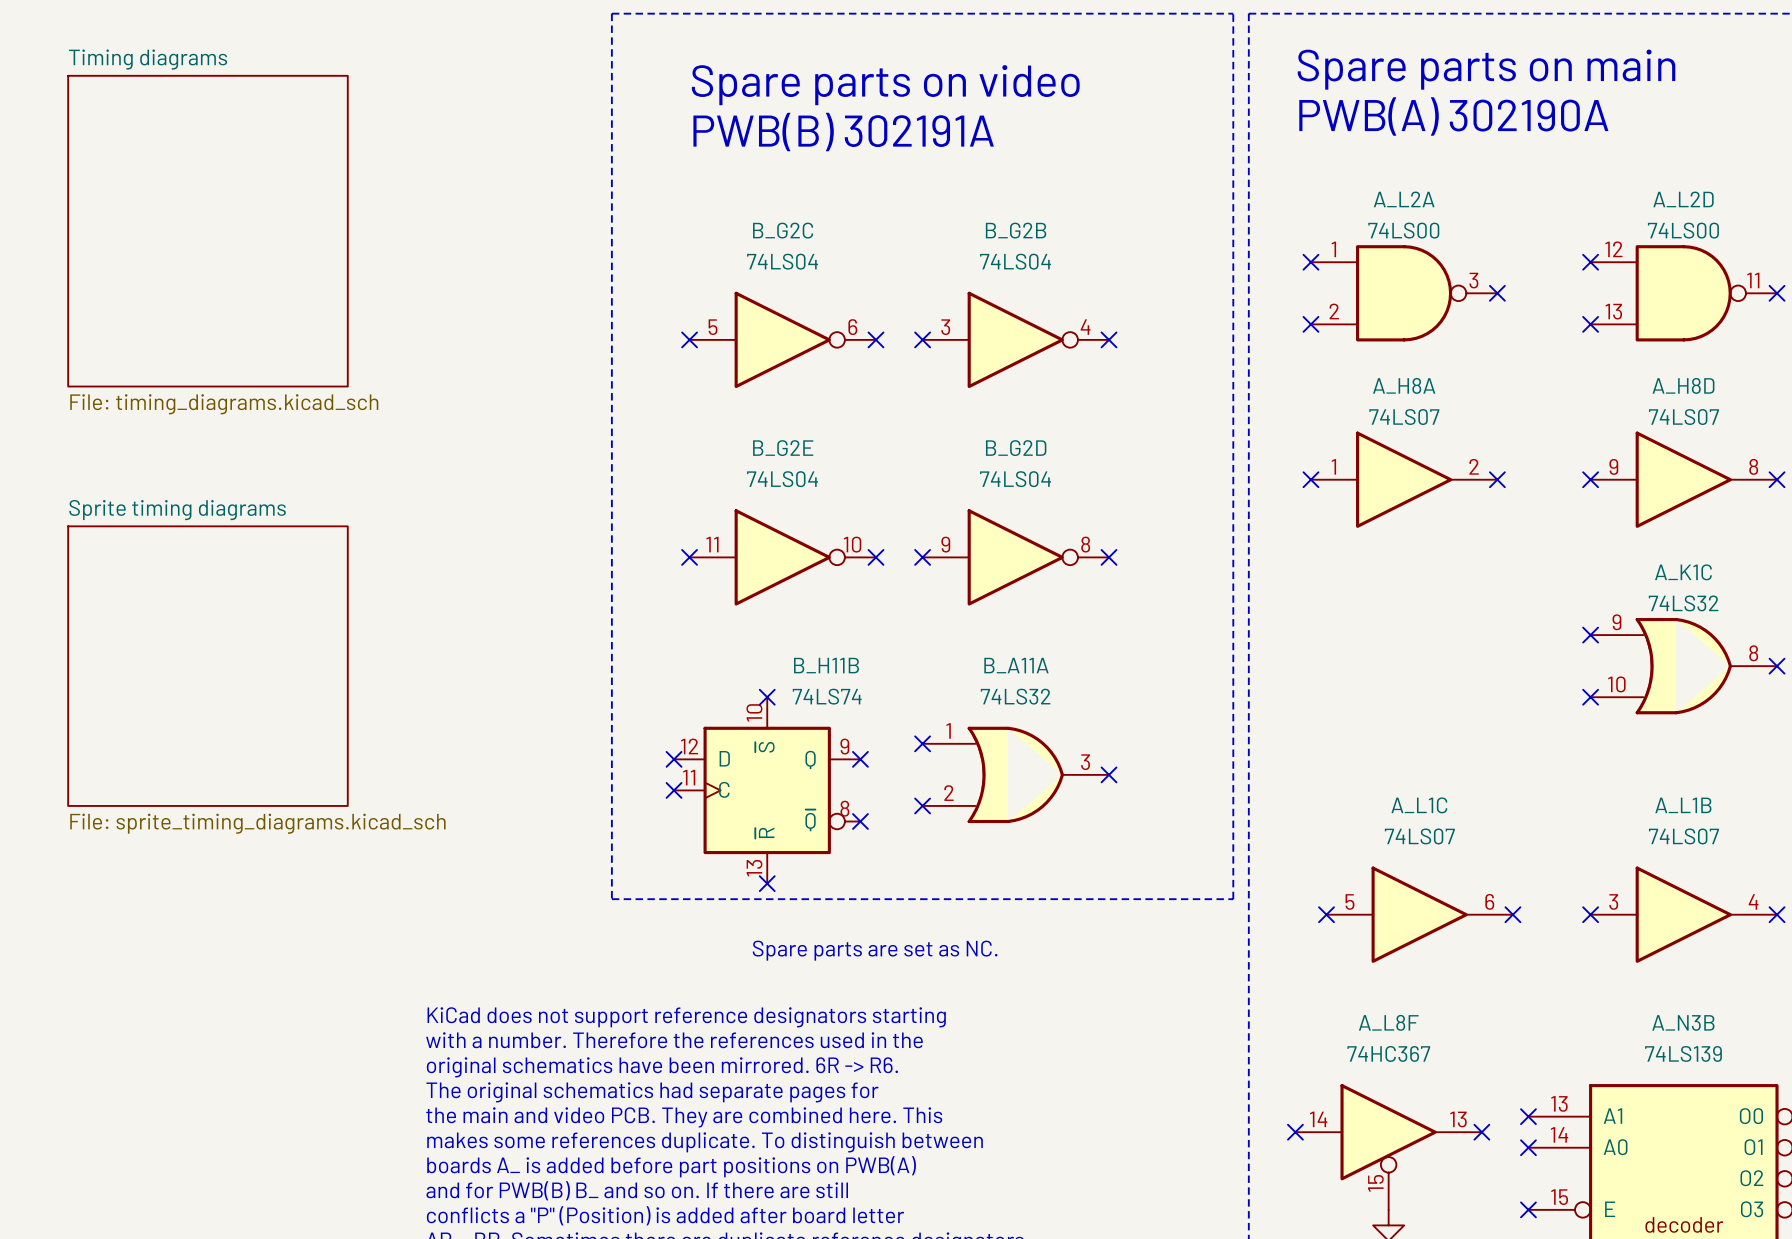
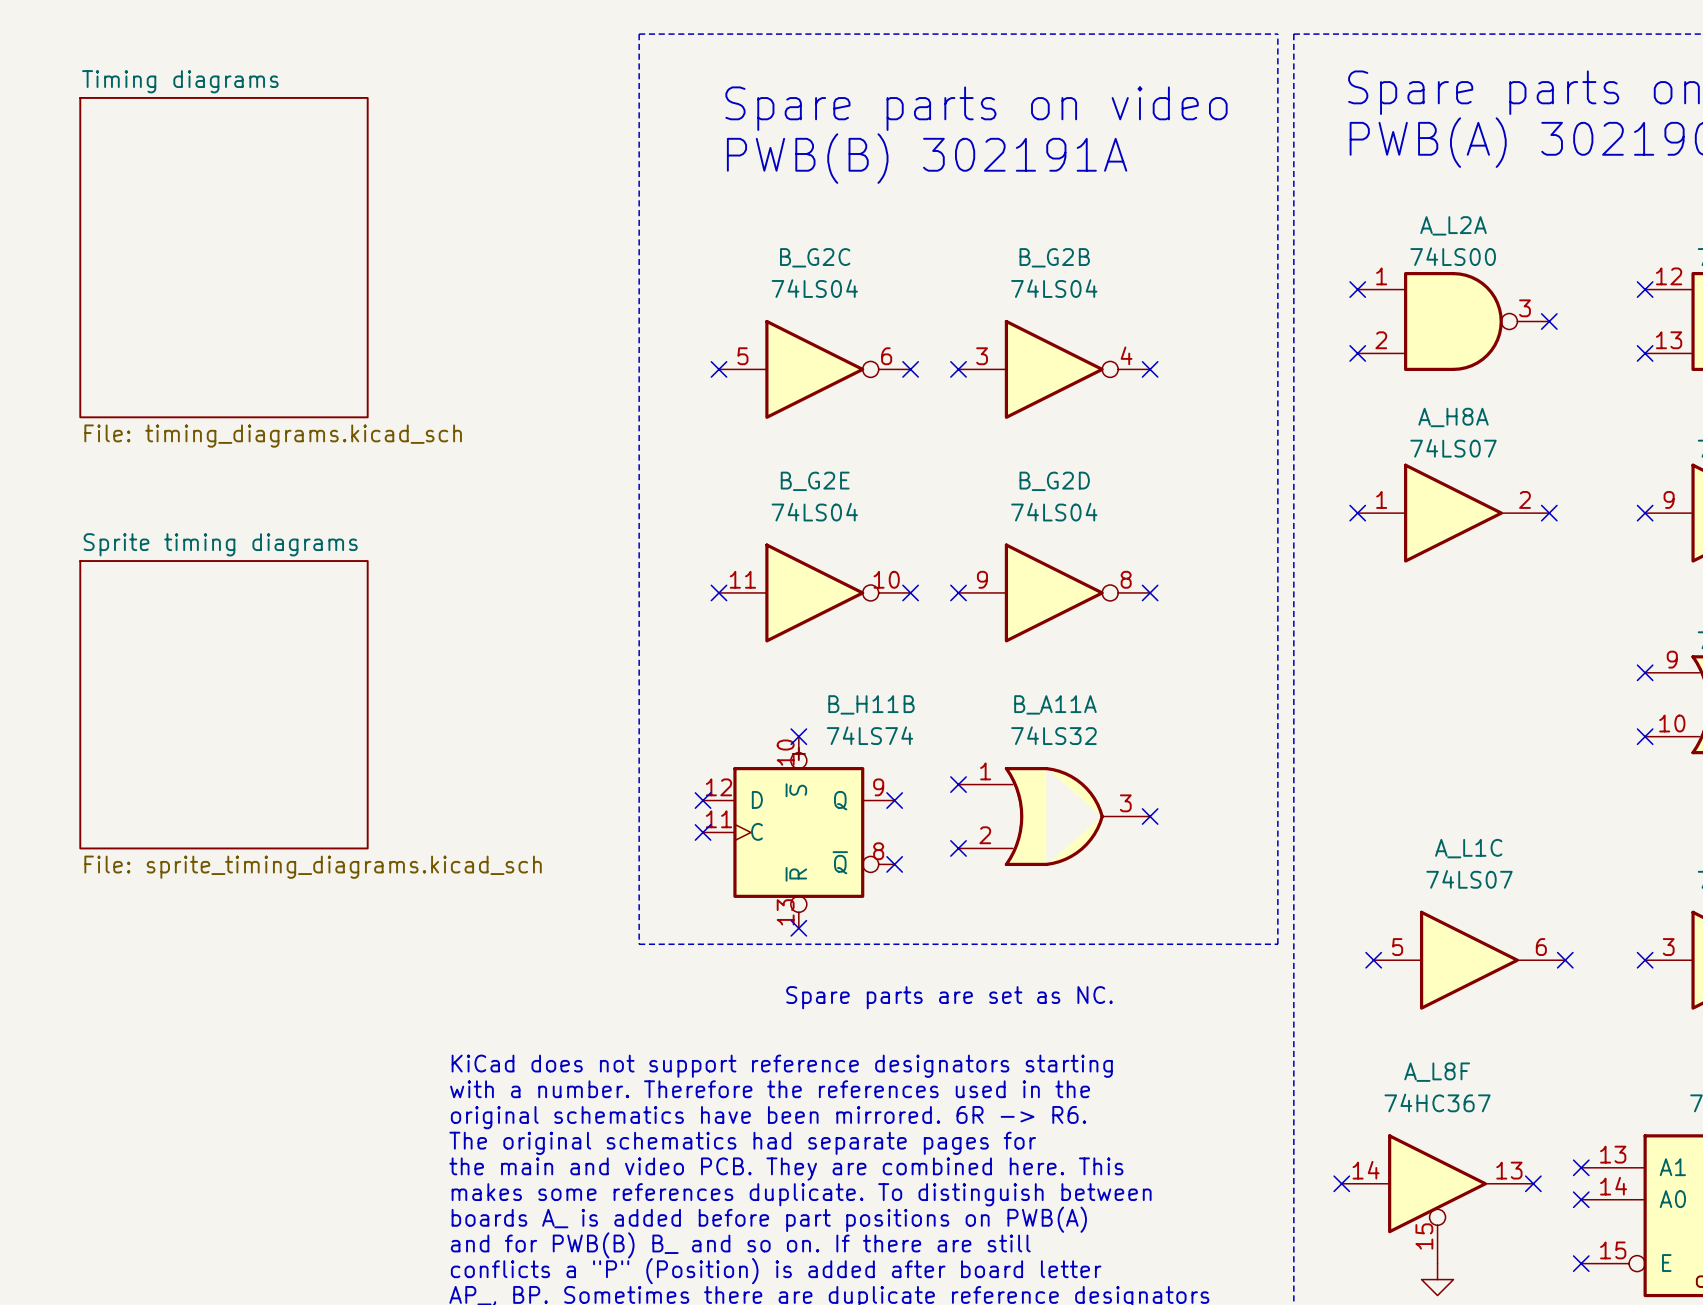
B_H11B symbol: [674, 697, 861, 884] -> [703, 736, 895, 929]

